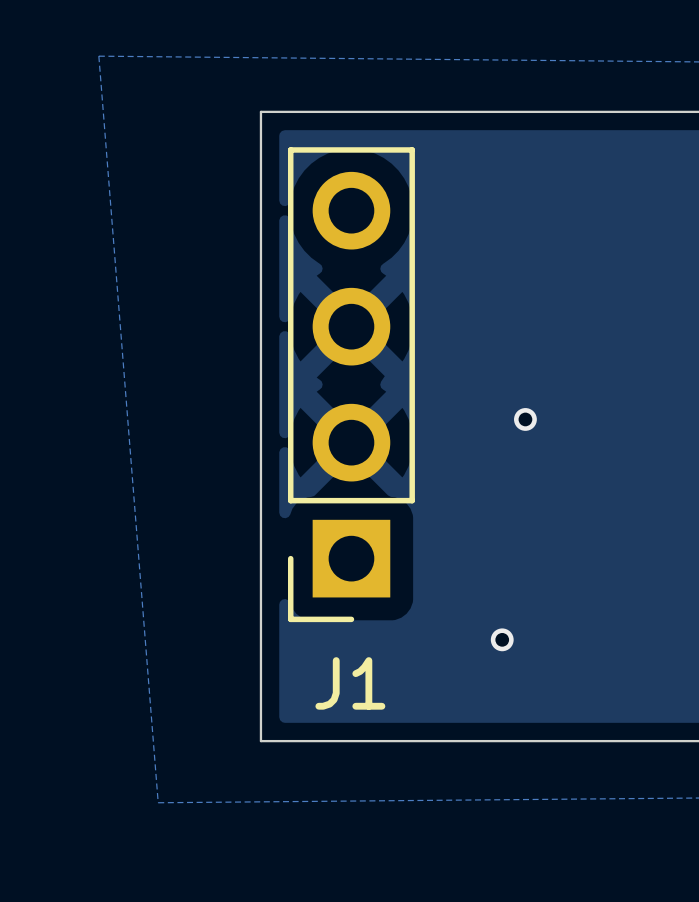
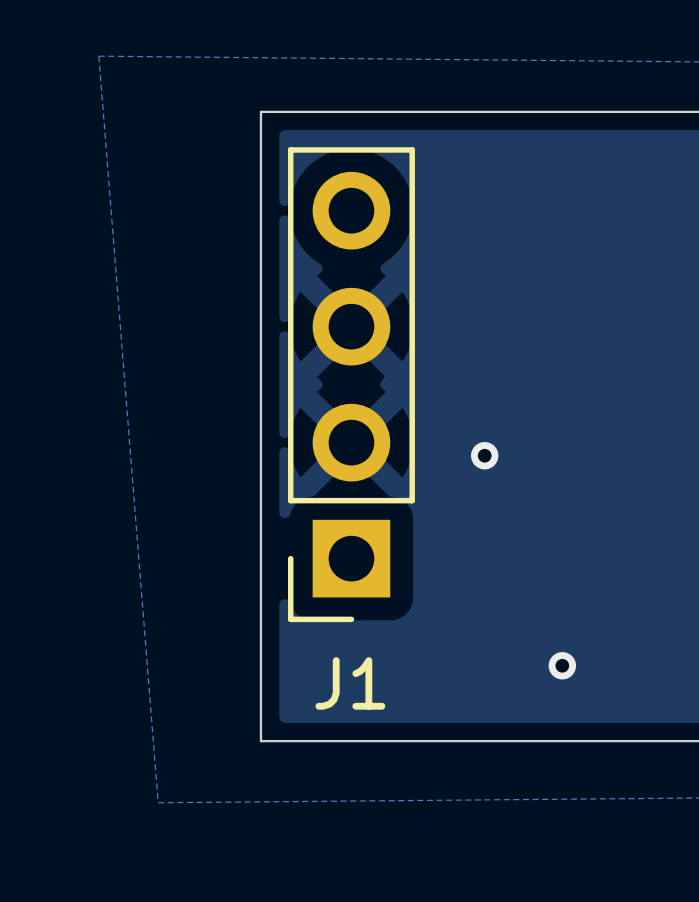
via: (525, 419) -> none
via: none -> (484, 455)
via: (502, 639) -> none
via: none -> (562, 665)

